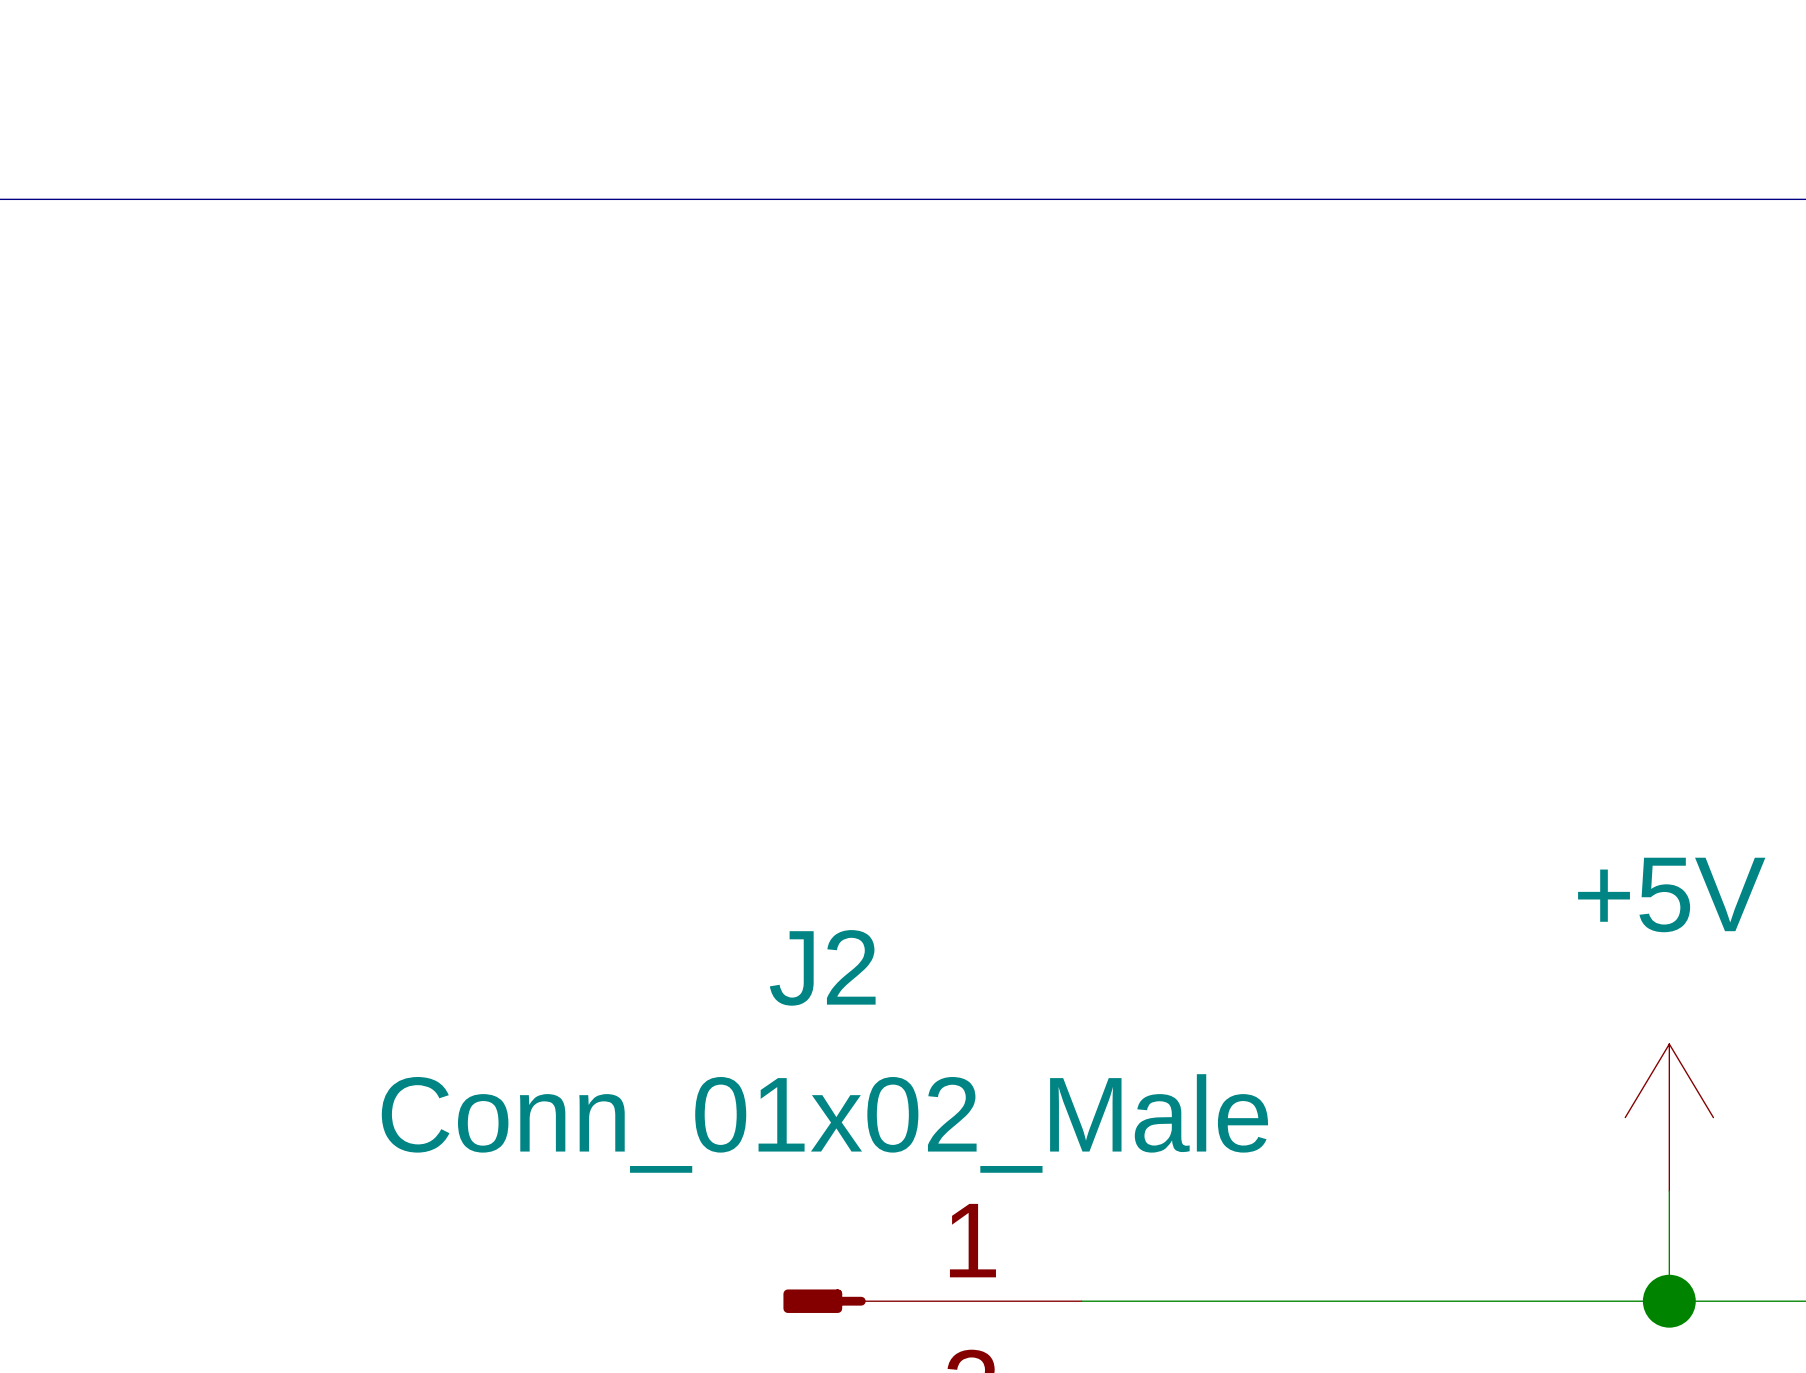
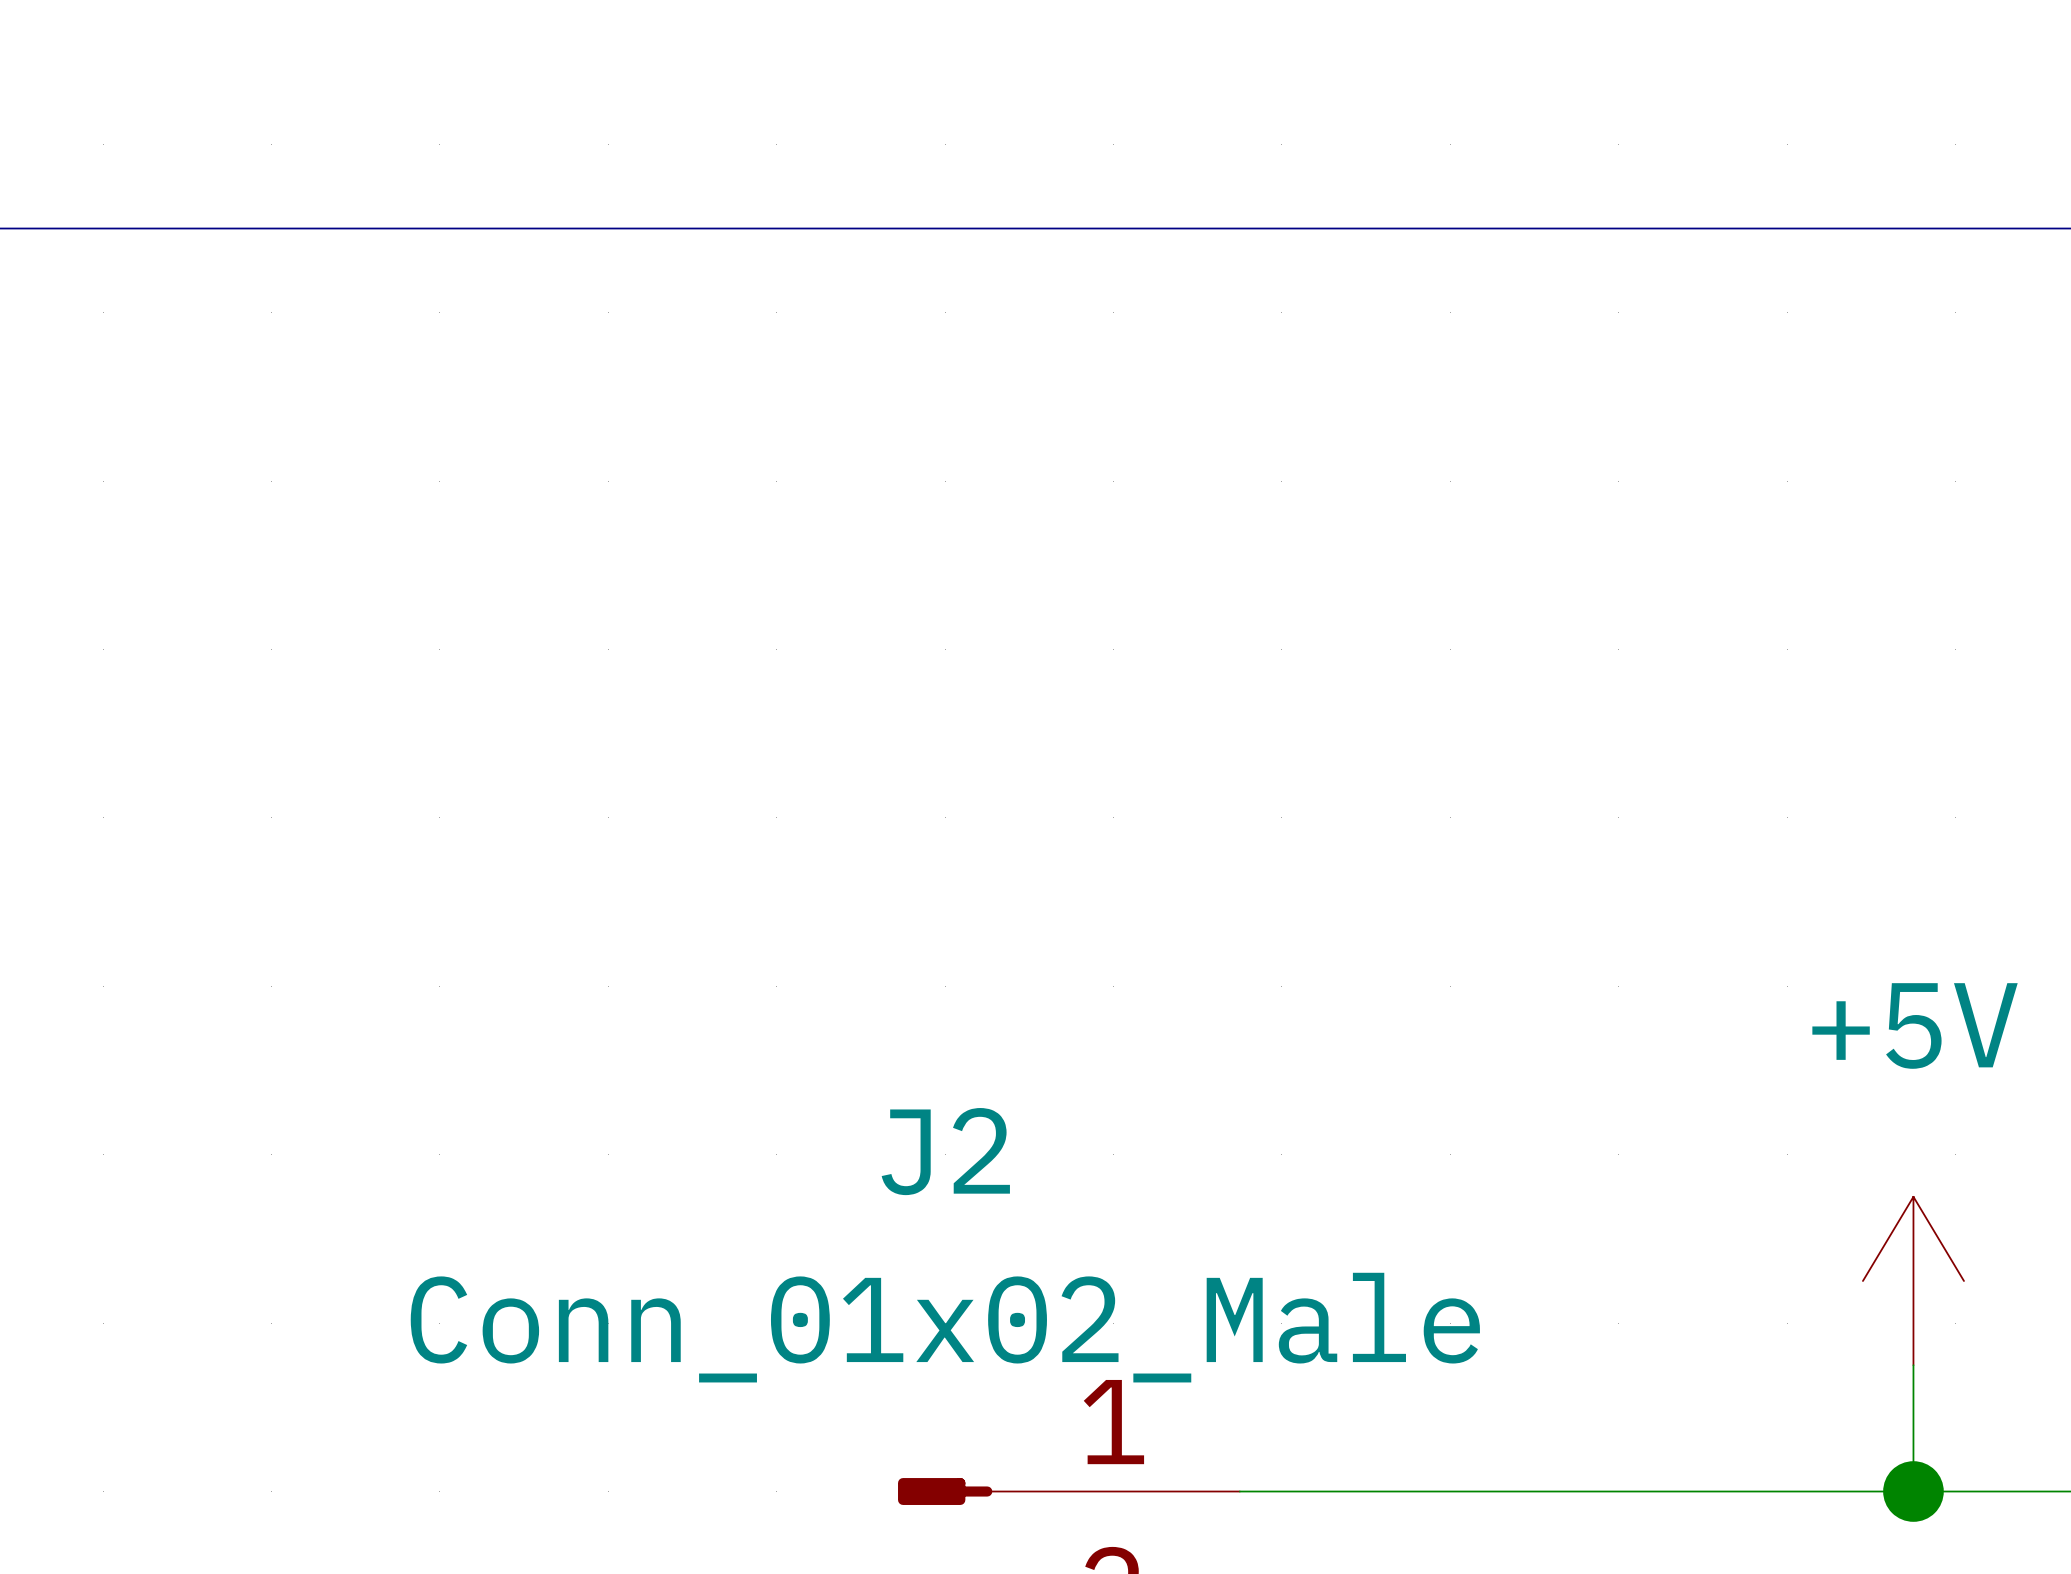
J2 name position: J2 (822, 967) -> J2 (945, 1151)
J2 value position: Conn_01x02_Male (824, 1123) -> Conn_01x02_Male (945, 1327)

